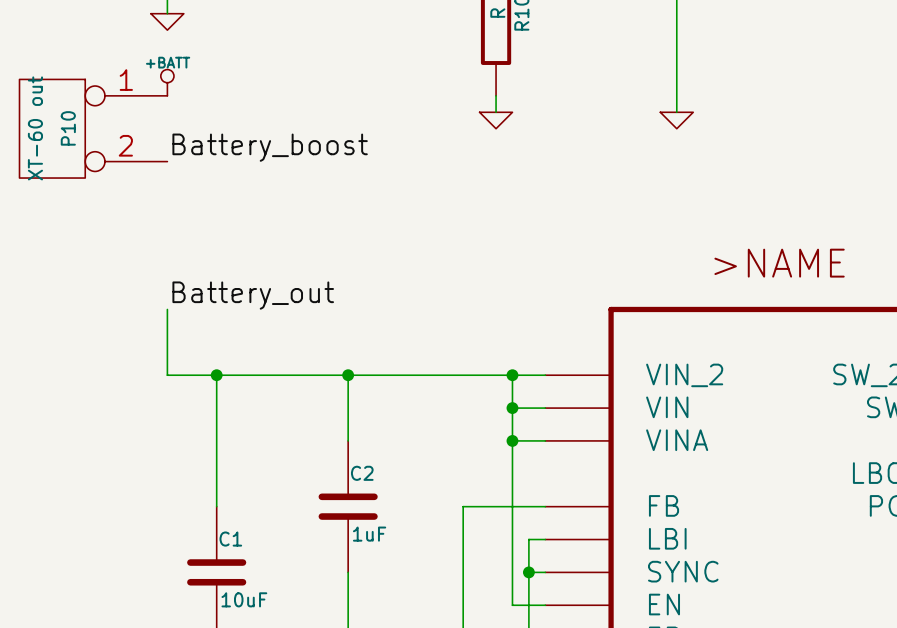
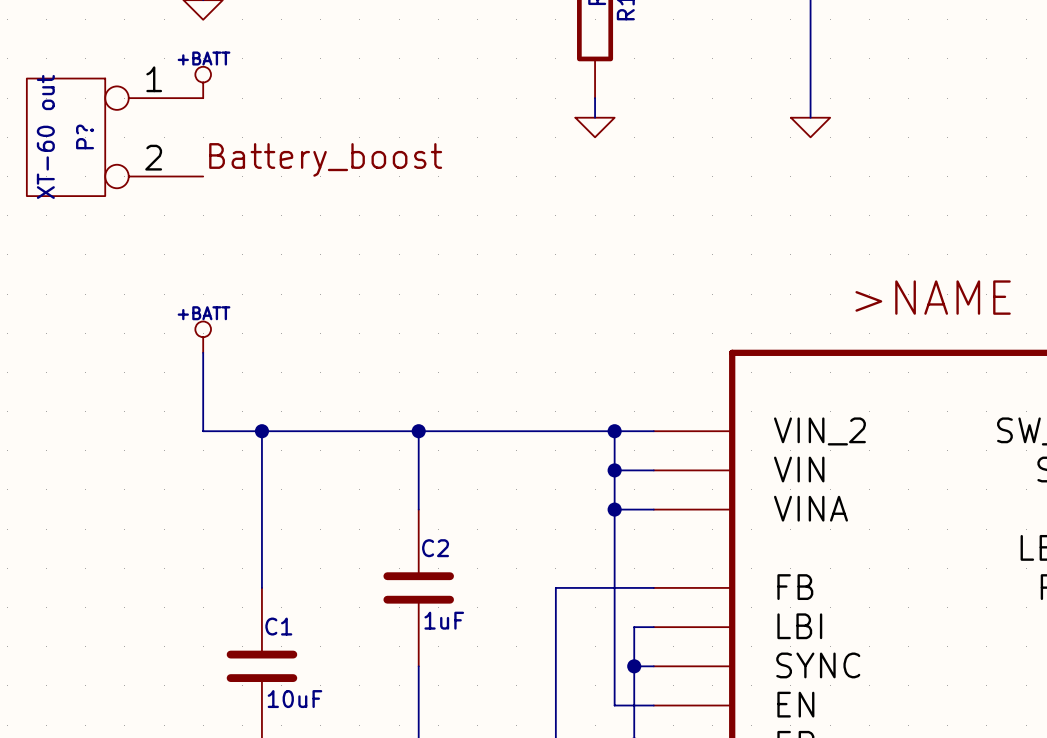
P10 name: P10 (68, 128) -> P? (85, 136)
label: Battery_out (253, 295) -> none
power symbol: none -> +BATT (203, 337)

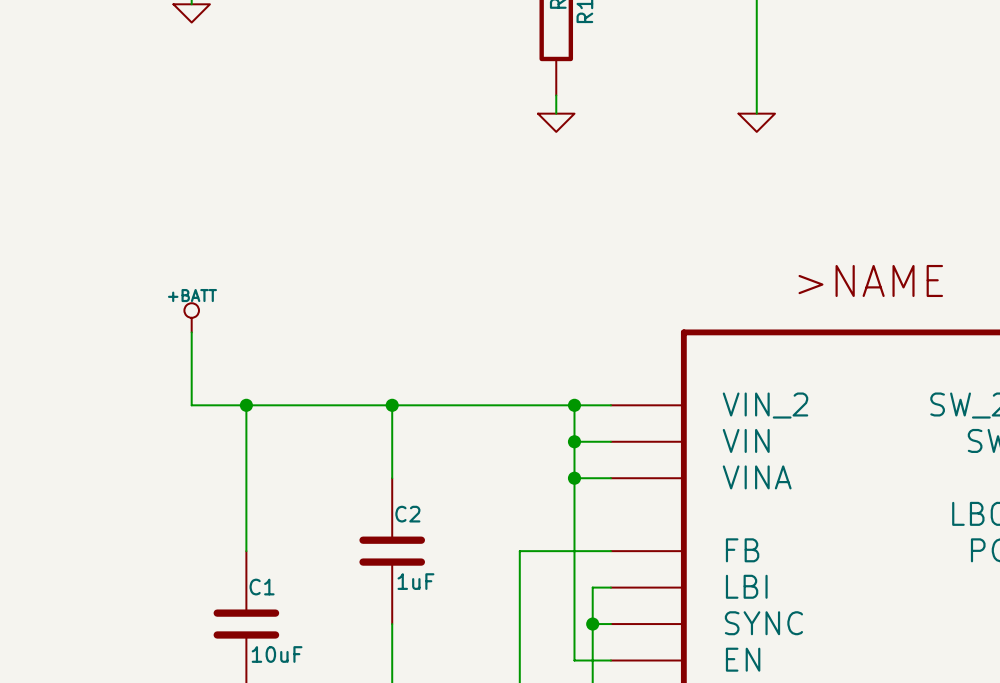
power symbol: +BATT (203, 82) -> none
P?: XT-60 out (115, 137) -> none
label: Battery_boost (325, 159) -> none

